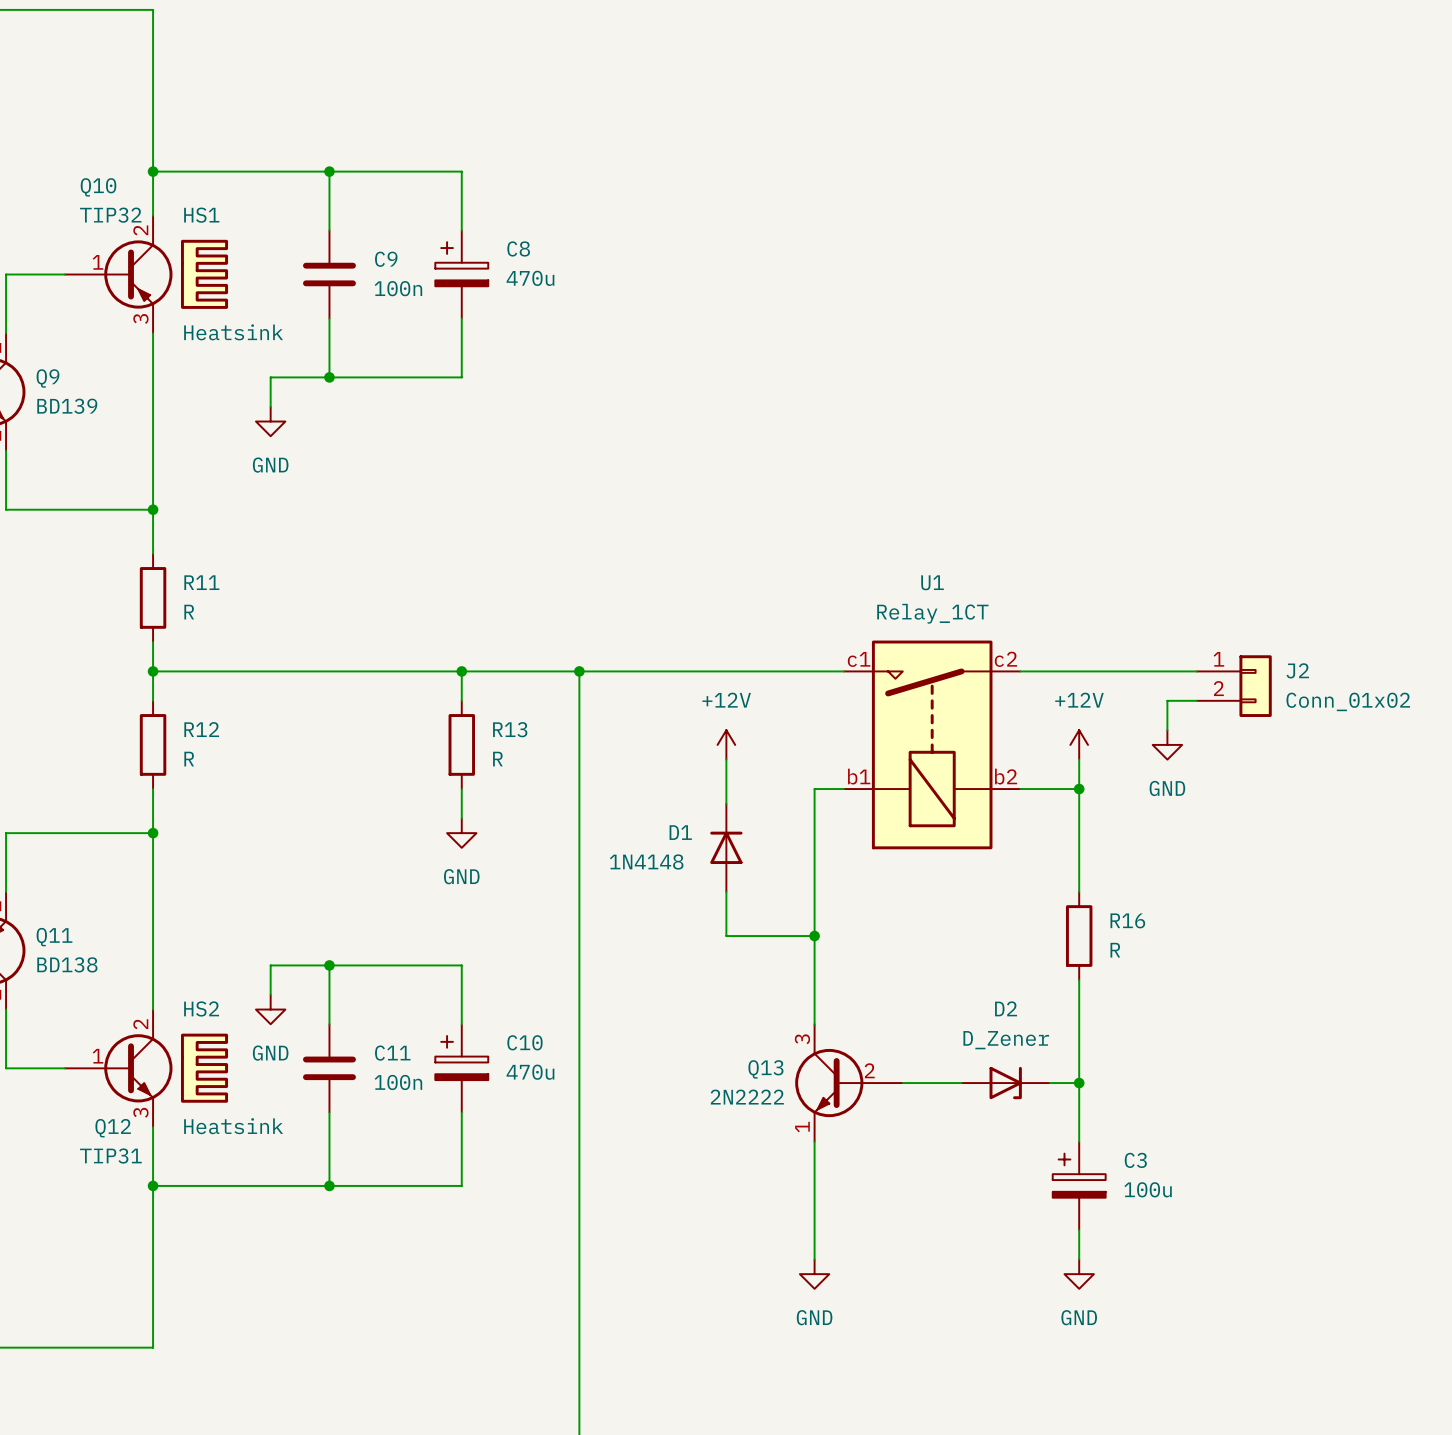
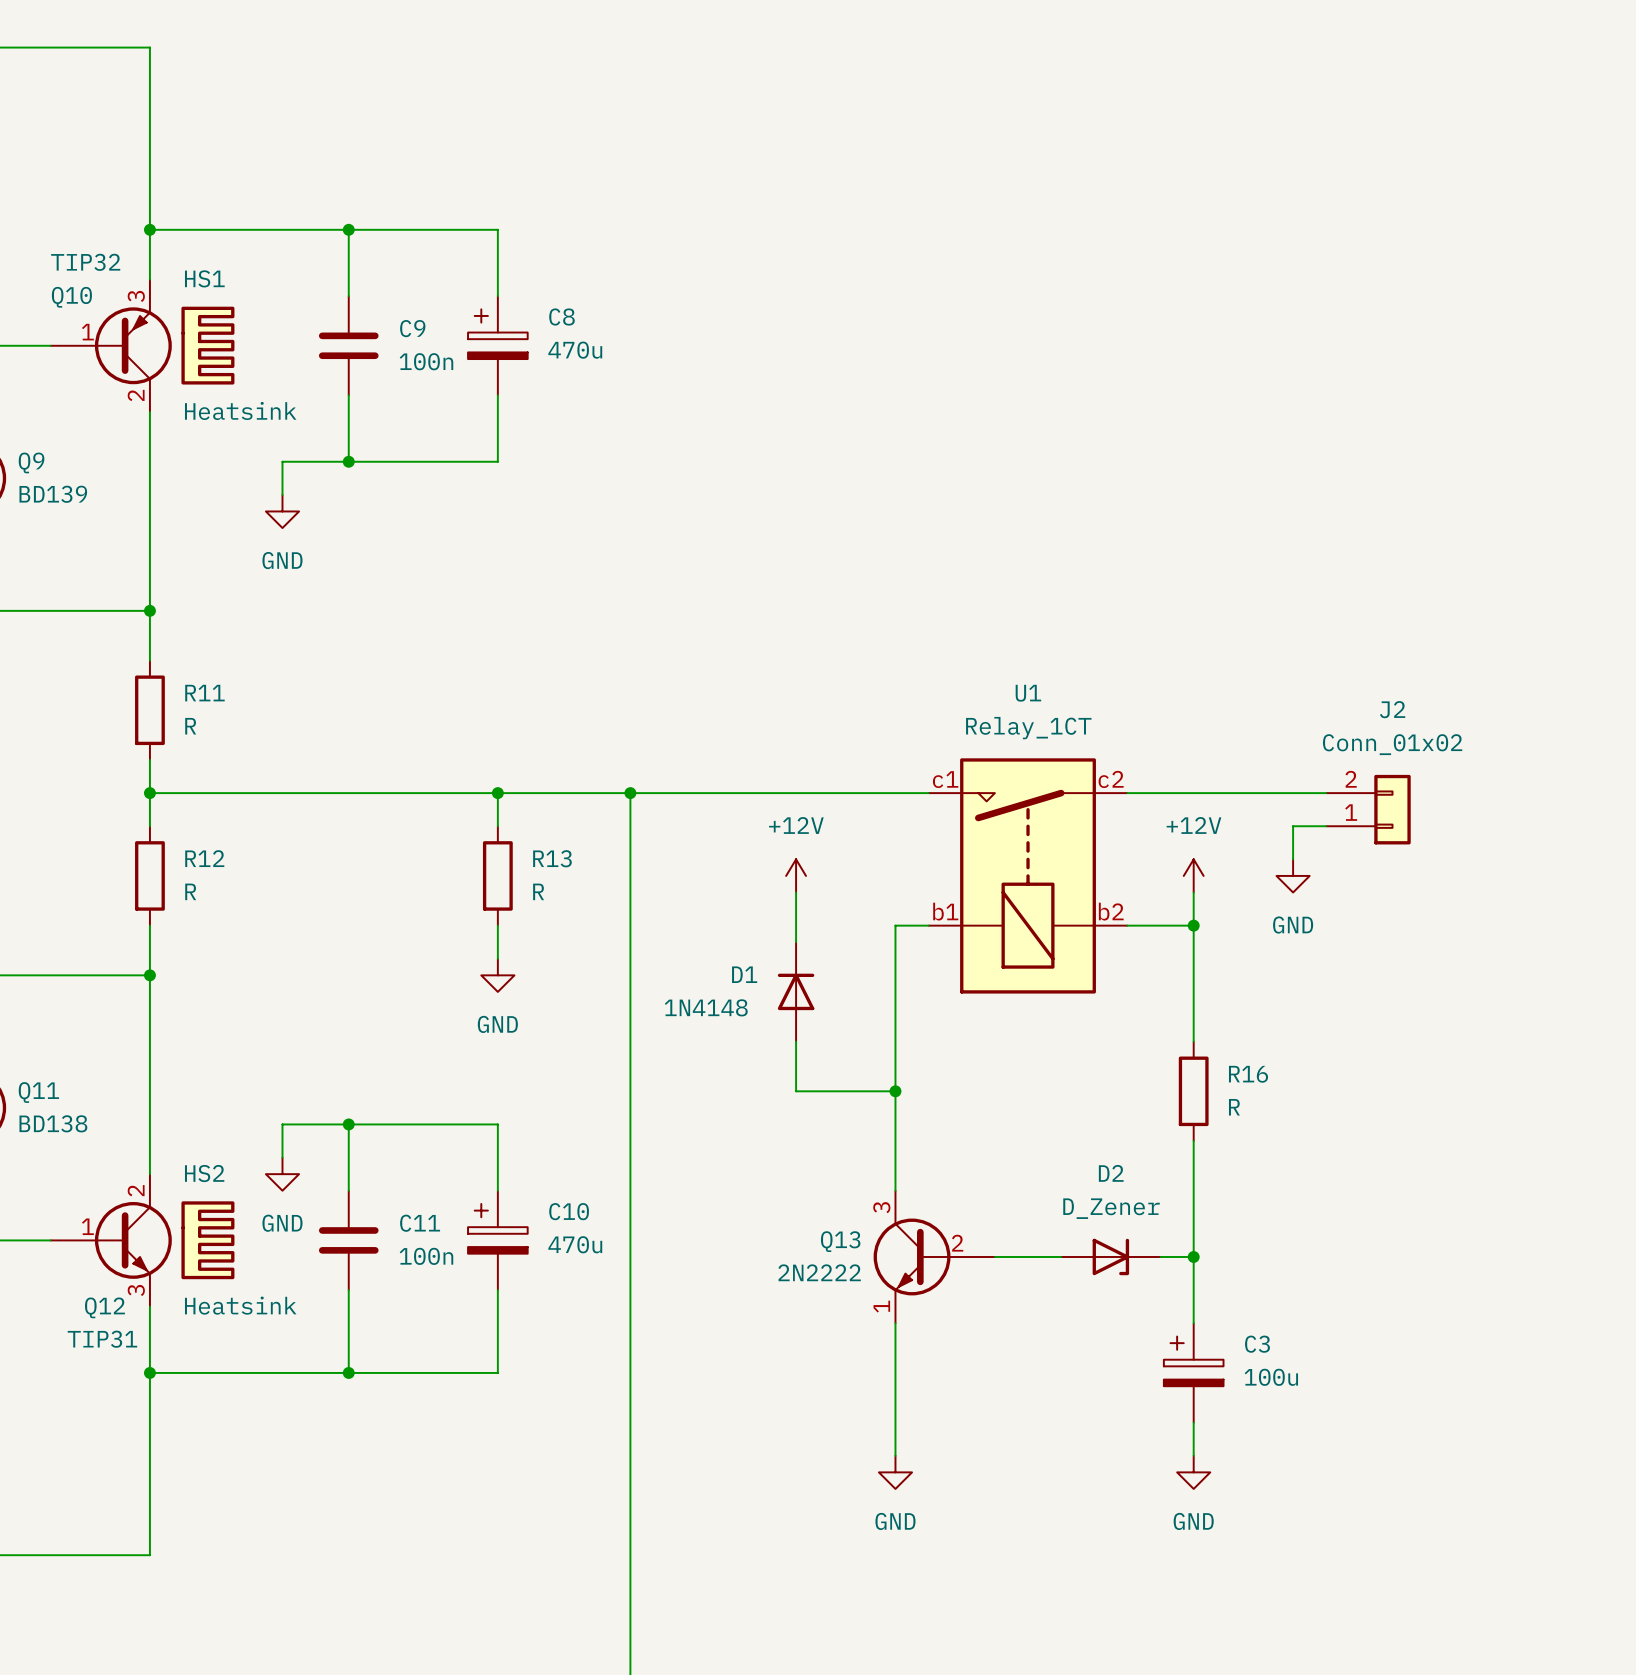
Q10 name position: Q10 (98, 187) -> Q10 (71, 297)
Q10 flip: as is (138, 274) -> up-down (133, 345)
J2 name position: J2 (1297, 670) -> J2 (1392, 709)
J2 flip: as is (1255, 686) -> up-down (1392, 809)
J2 value position: Conn_01x02 (1348, 701) -> Conn_01x02 (1392, 744)

